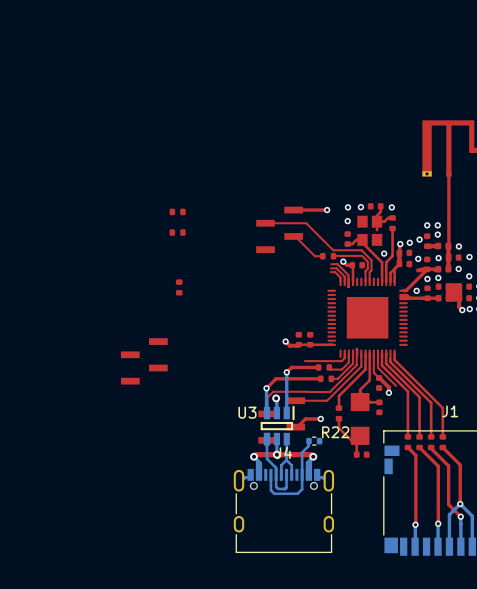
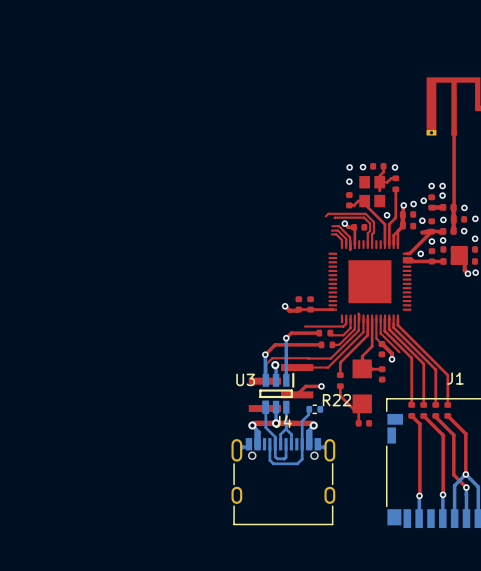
top track: (327, 210) (295, 210) -> none
via: (327, 210) -> none
part: (177, 211) -> none
top track: (263, 223) (306, 223) (333, 250) (361, 250) (363, 252) -> (325, 216) (328, 213) (365, 213)
part: (279, 229) -> none
part: (177, 232) -> none
top track: (295, 236) (314, 256) (322, 256) -> none
part: (328, 256) -> none
part: (179, 287) -> none
part: (144, 361) -> none
part footprint: [258, 397, 306, 444] -> [248, 364, 314, 413]

